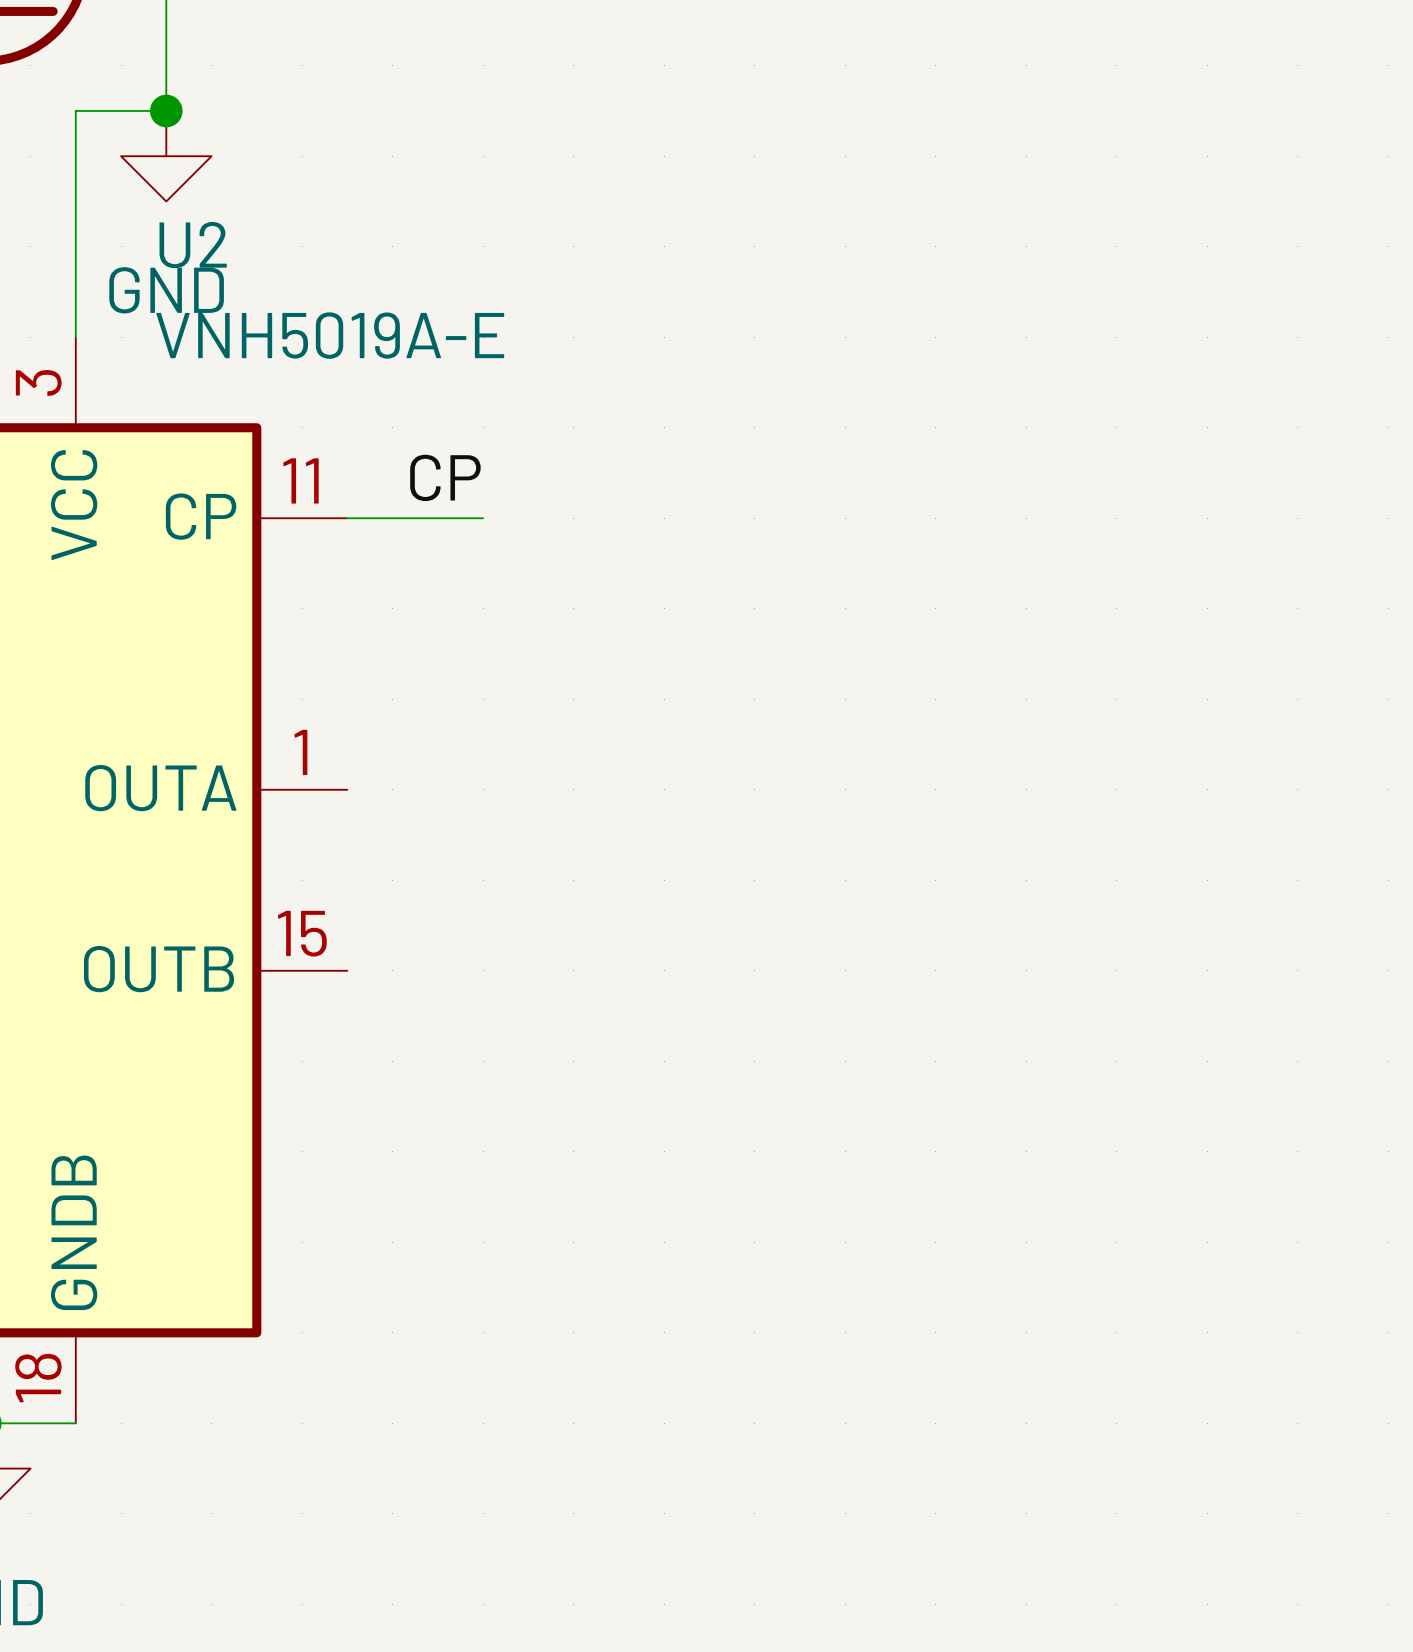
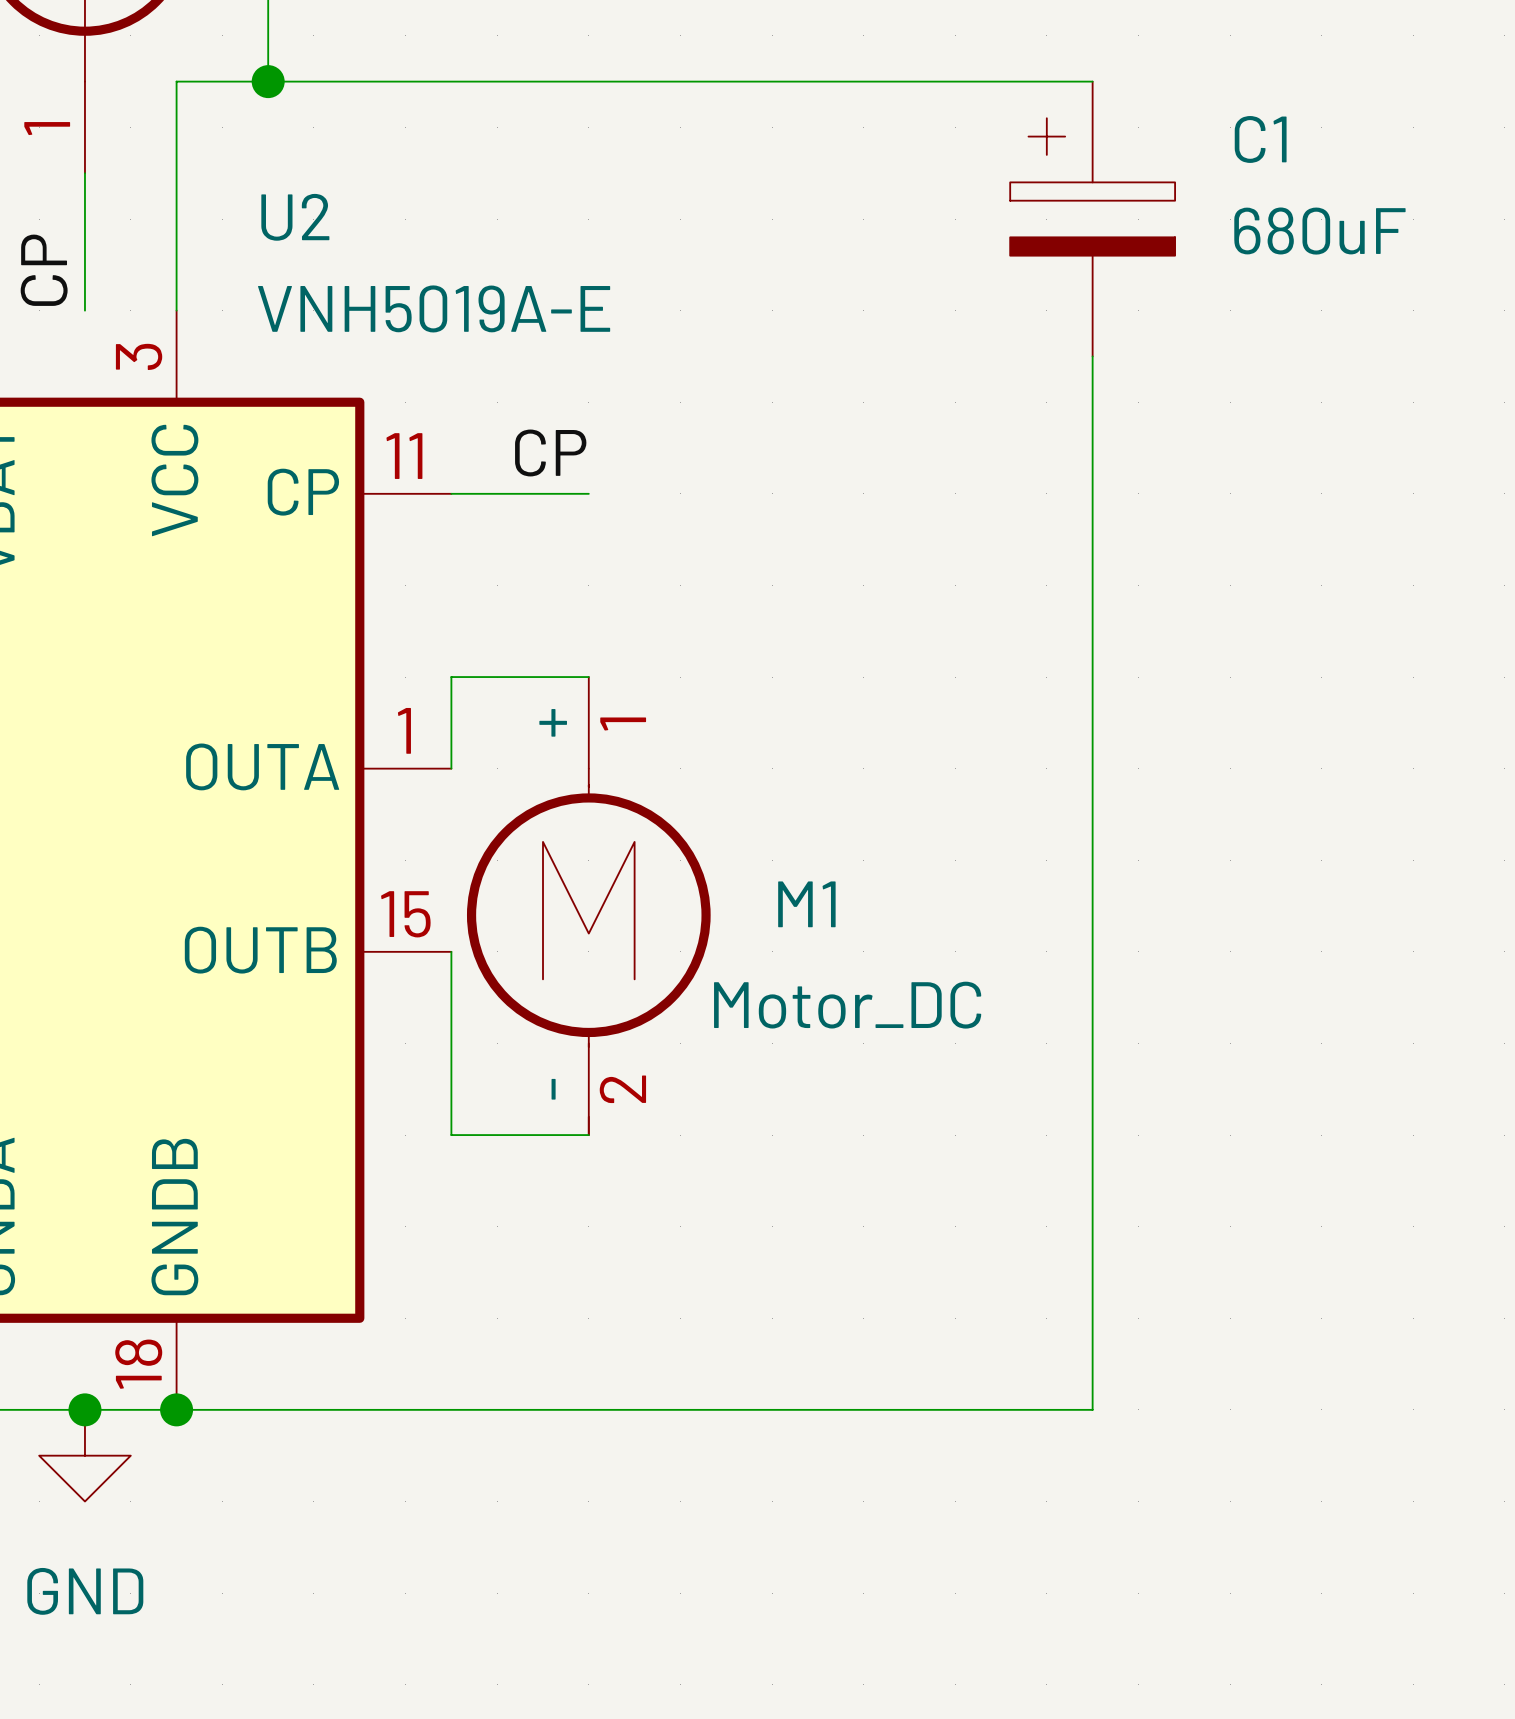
wire: none -> (268, 81) (1092, 81)
power symbol: GND (166, 156) -> none
C1: none -> 680uF (1092, 219)
wire: none -> (1092, 356) (1092, 1409) (176, 1409)
wire: none -> (588, 677) (451, 677) (451, 768)
M1: none -> Motor_DC (588, 906)
wire: none -> (451, 951) (451, 1135) (588, 1135)
junction: none -> (176, 1409)

